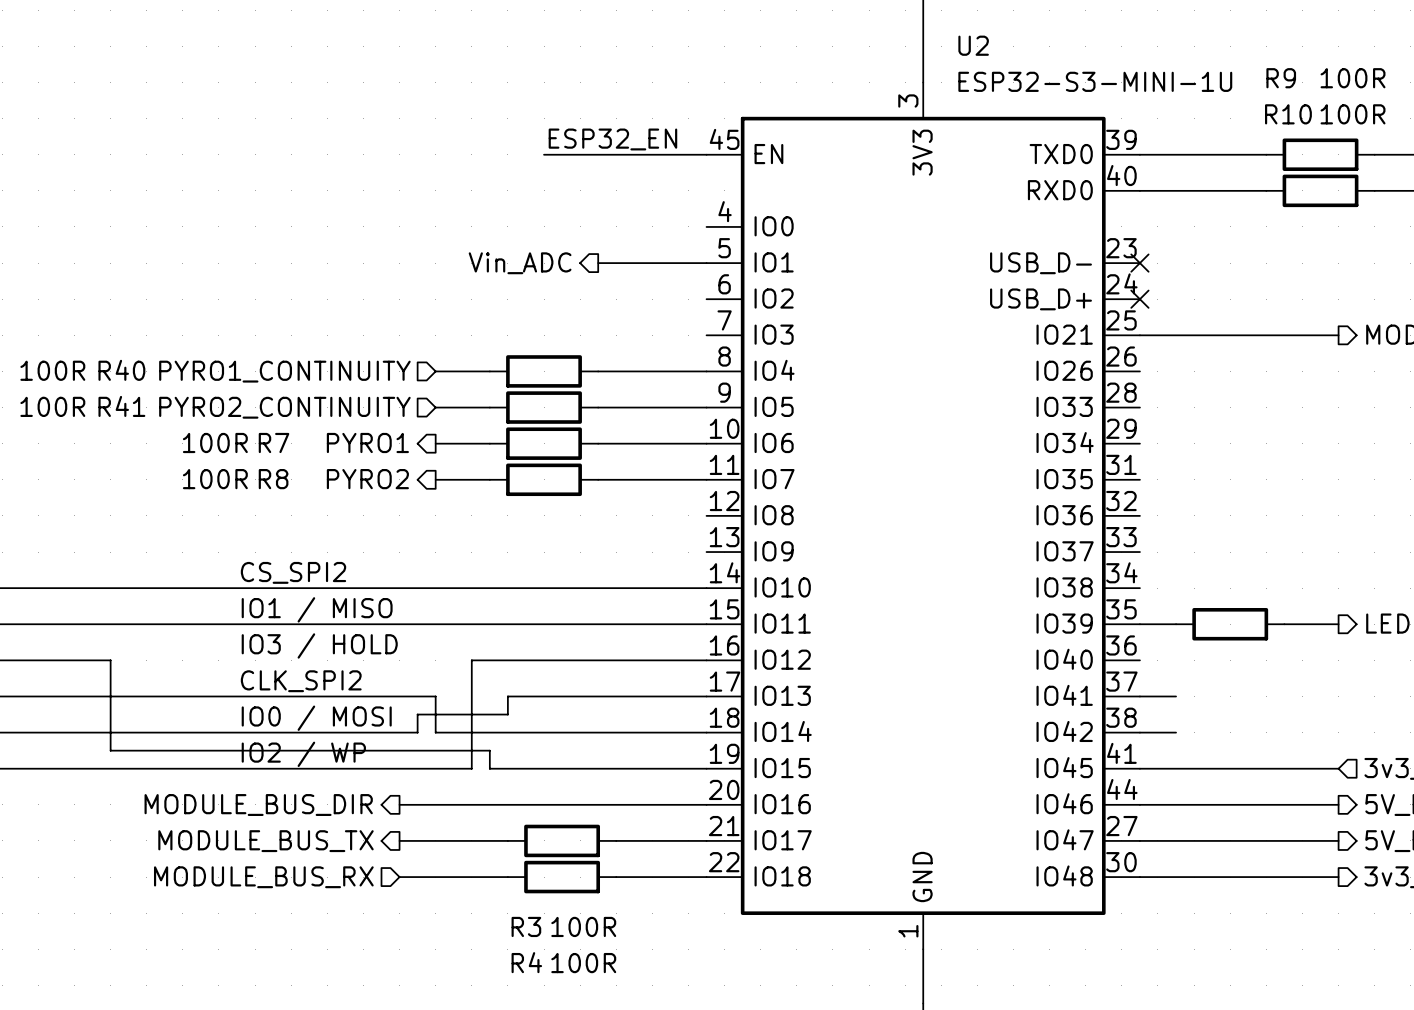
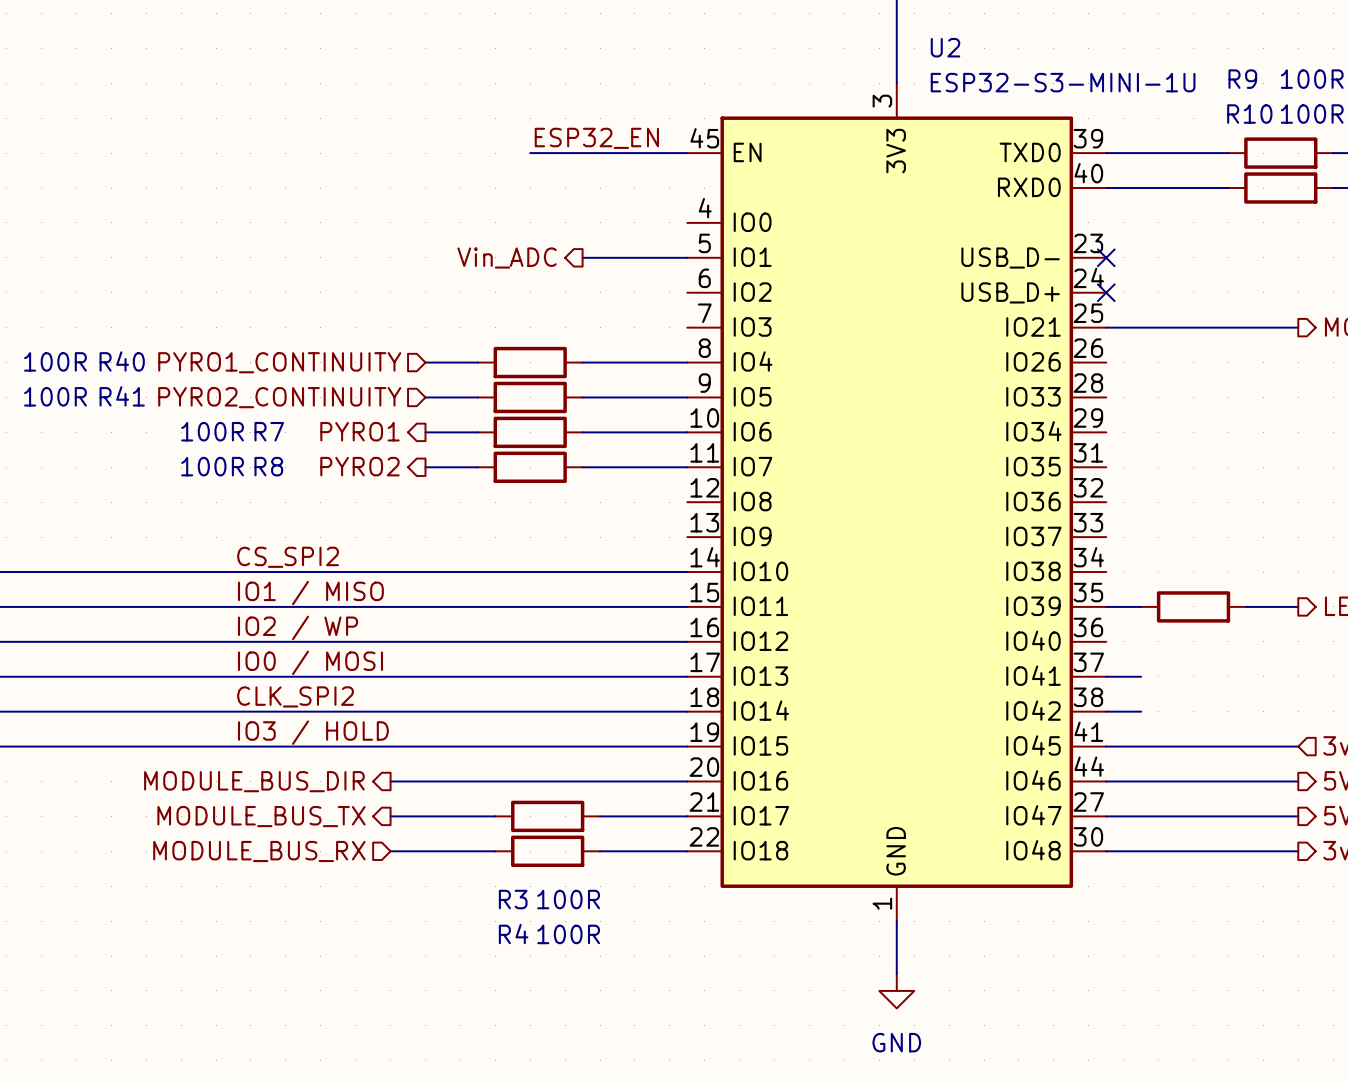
label: IO3 / HOLD (319, 645) -> IO2 / WP (298, 627)
wire: (110, 660) (110, 750) (489, 750) (489, 768) -> (111, 641) (460, 641)
wire: (471, 660) (471, 768) -> (477, 746) (460, 746)
label: CLK_SPI2 (301, 681) -> IO0 / MOSI (310, 662)
wire: (435, 696) (435, 732) -> (408, 711) (425, 711)
wire: (507, 696) (507, 714) (417, 714) (417, 732) -> (495, 676) (425, 676)
label: IO0 / MOSI (316, 718) -> CLK_SPI2 (295, 696)
label: IO2 / WP (303, 754) -> IO3 / HOLD (313, 732)

